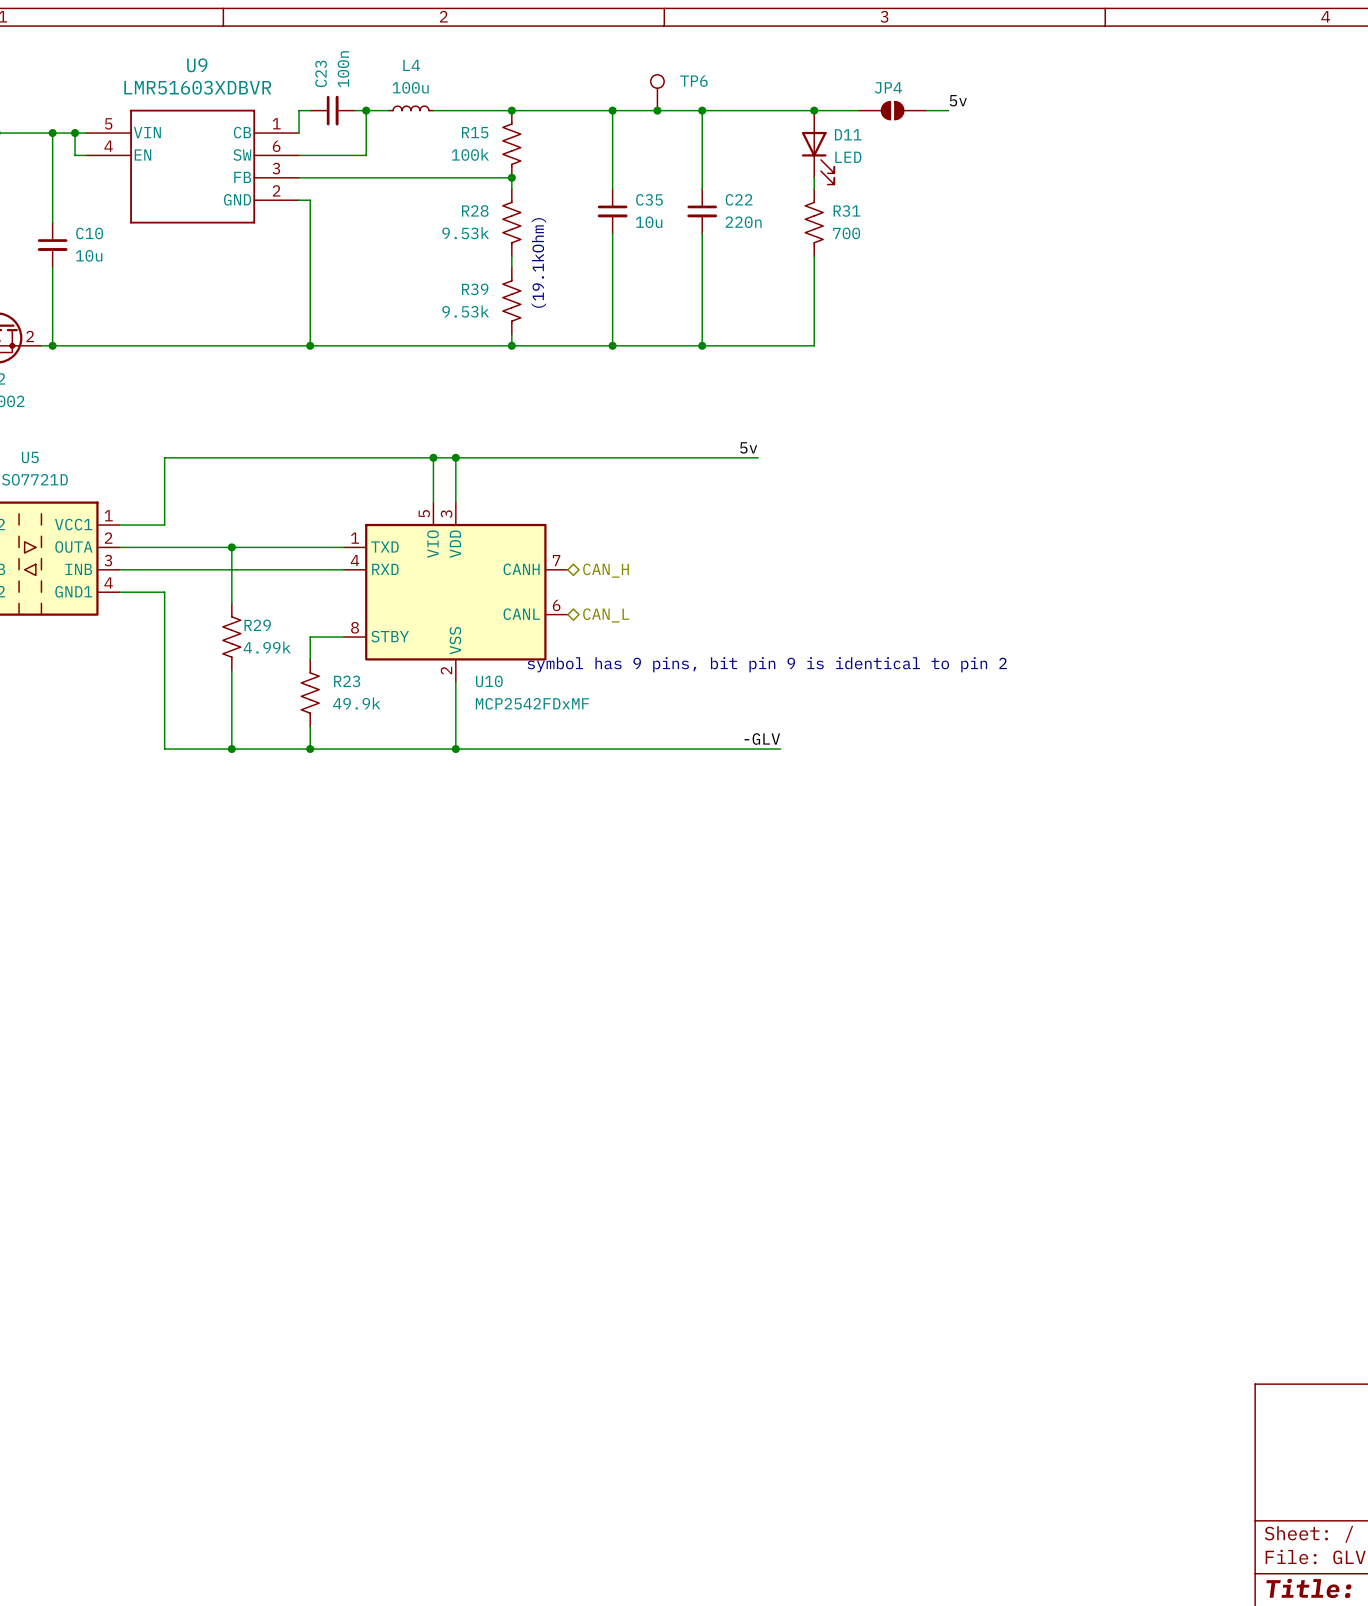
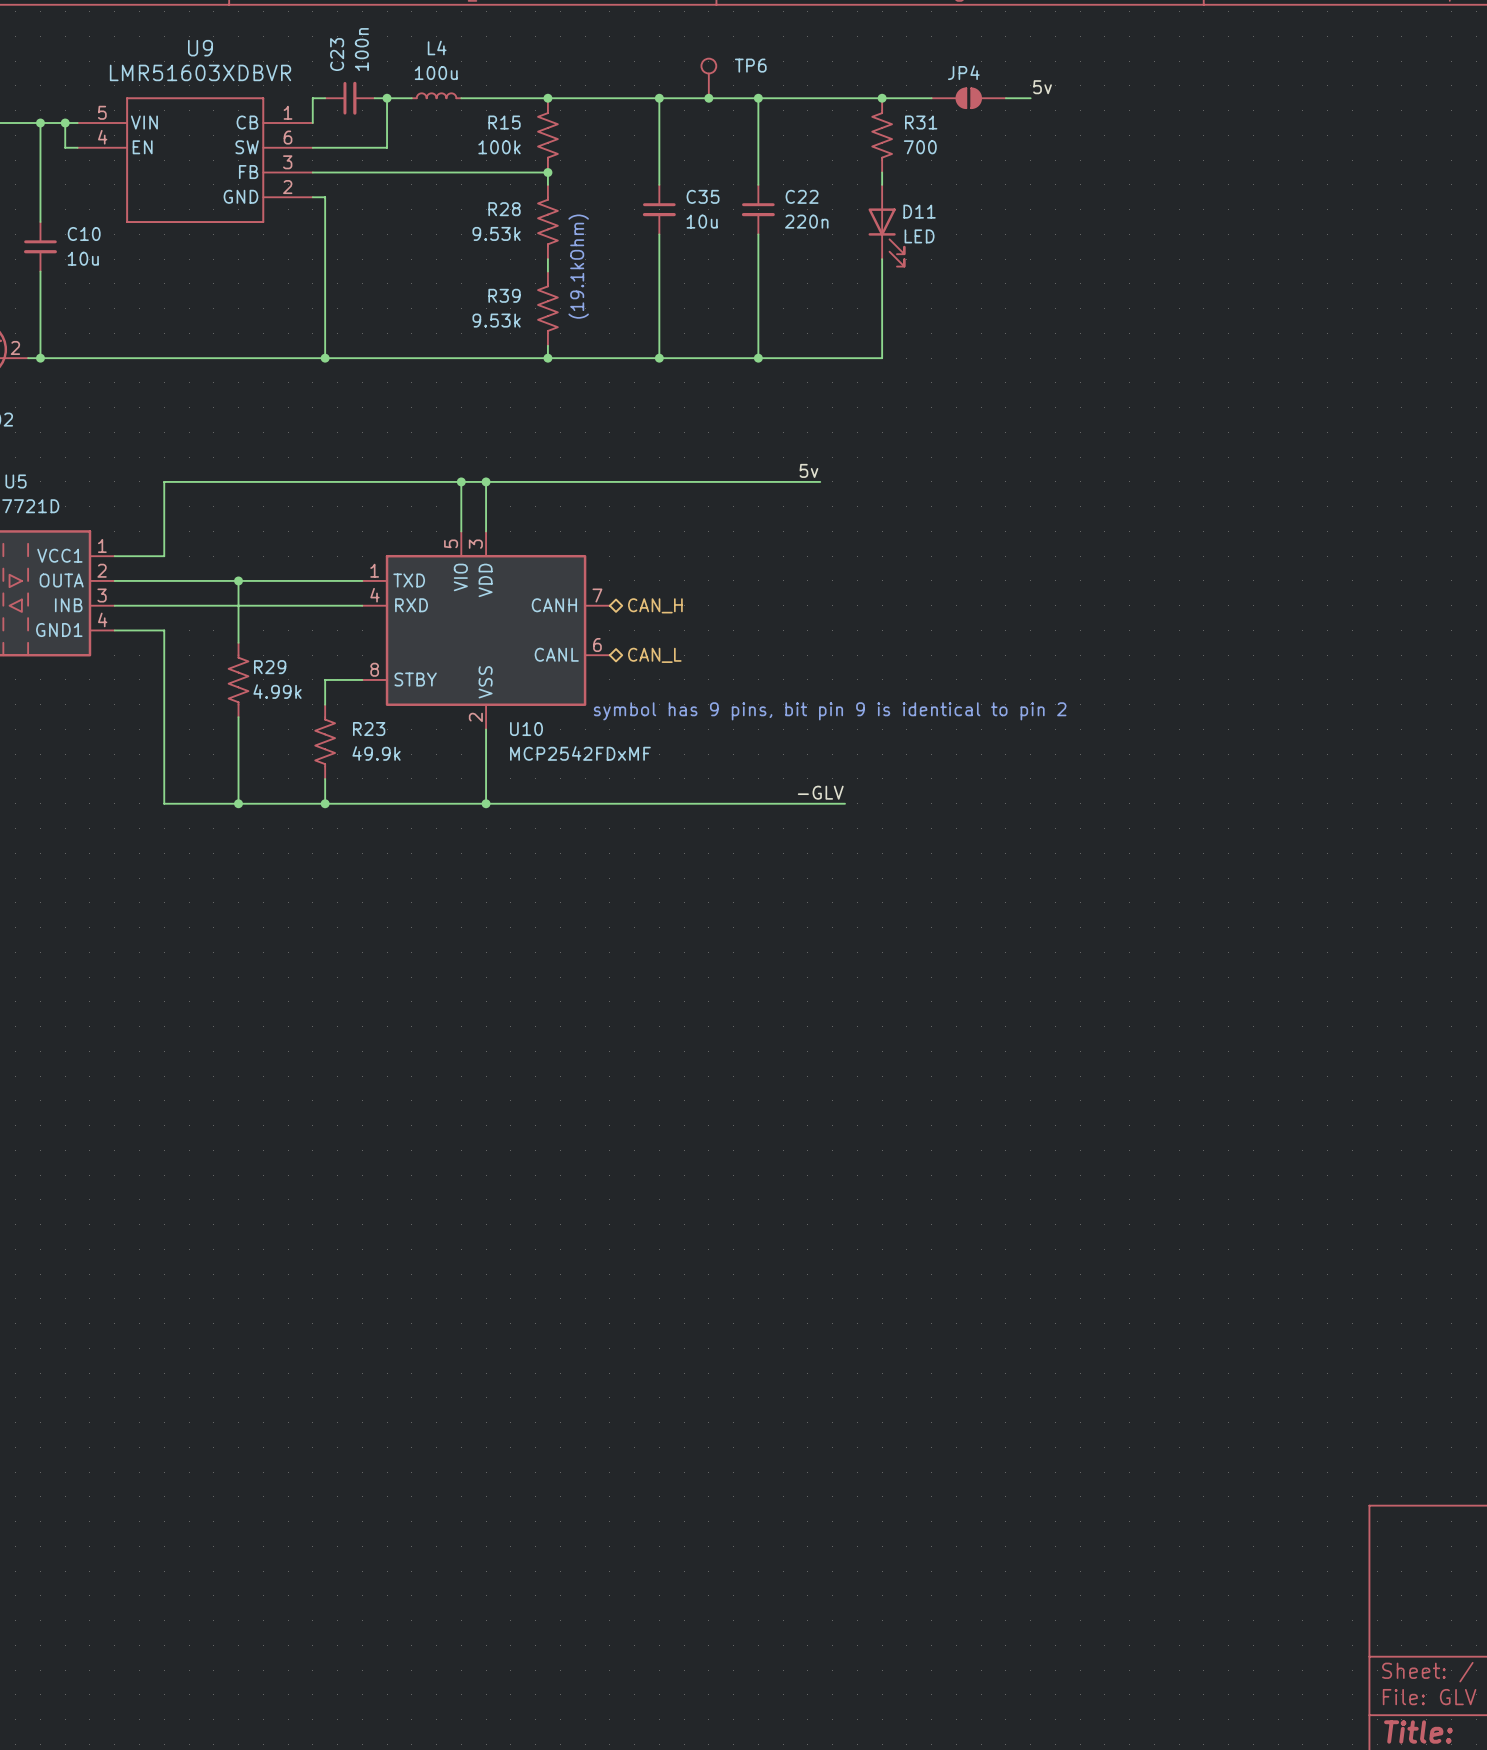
D11 position: (818, 147) -> (886, 225)
R31 position: (814, 222) -> (882, 135)

